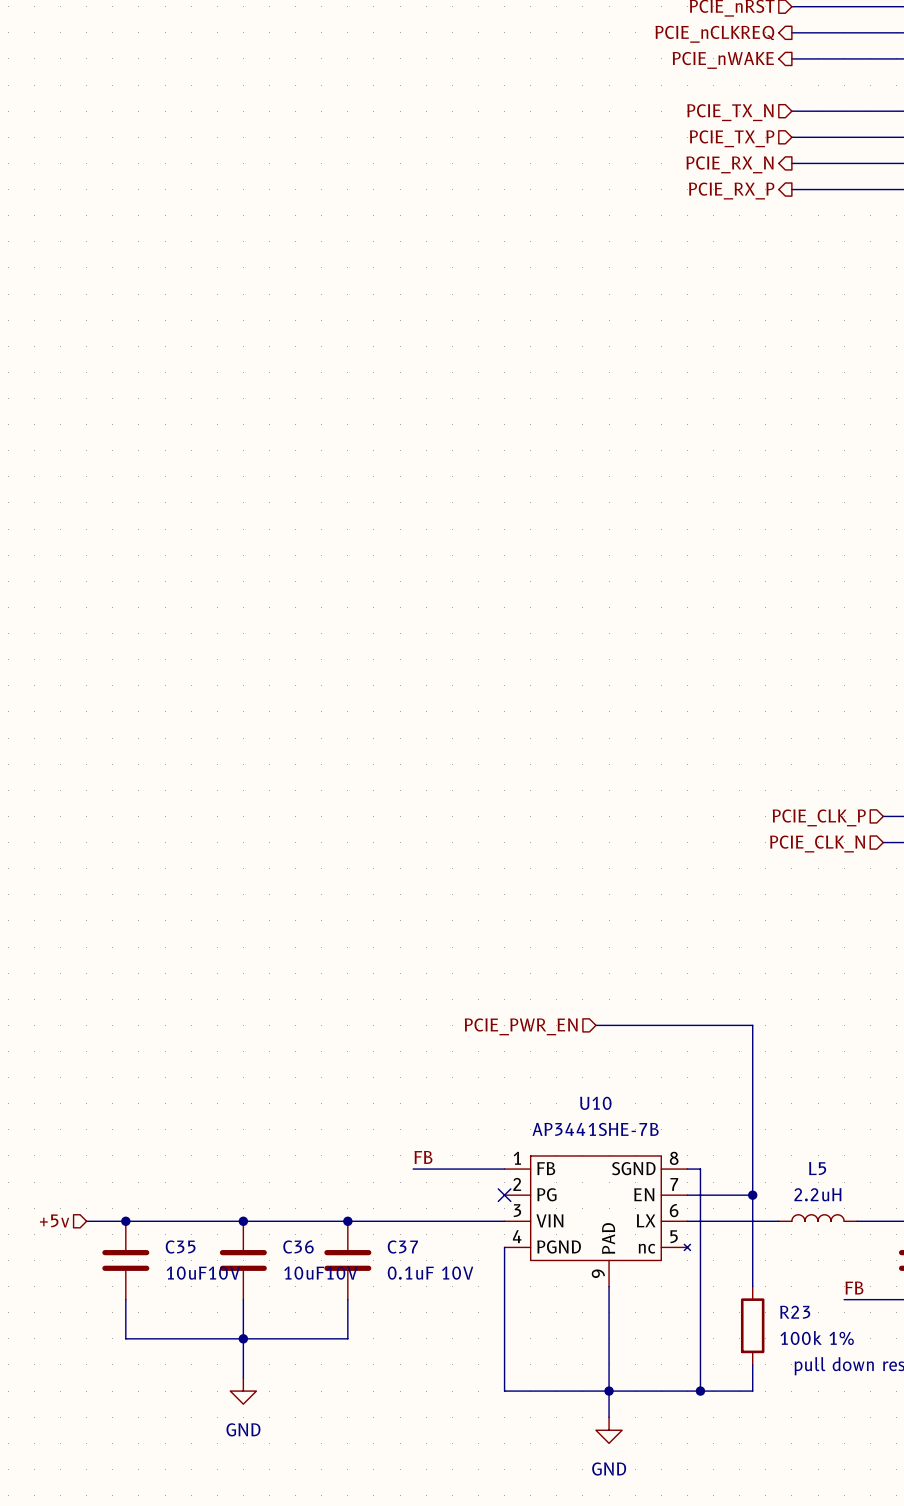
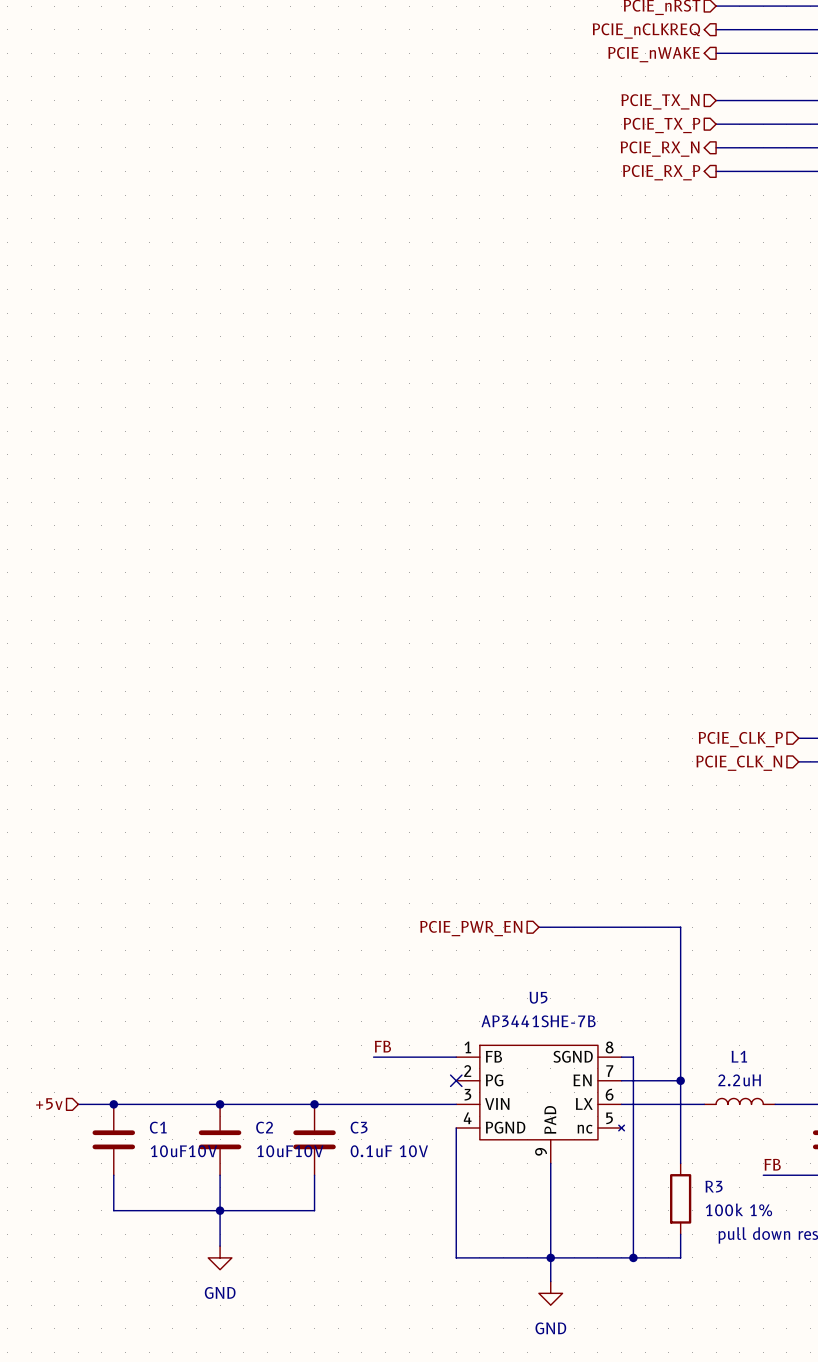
U10 name: U10 (595, 1103) -> U5 (538, 997)
L5 name: L5 (817, 1168) -> L1 (739, 1056)
C35 name: C35 (180, 1247) -> C1 (158, 1127)
C36 name: C36 (298, 1247) -> C2 (264, 1127)
C37 name: C37 (402, 1247) -> C3 (359, 1127)
R23 name: R23 (795, 1312) -> R3 (714, 1186)

